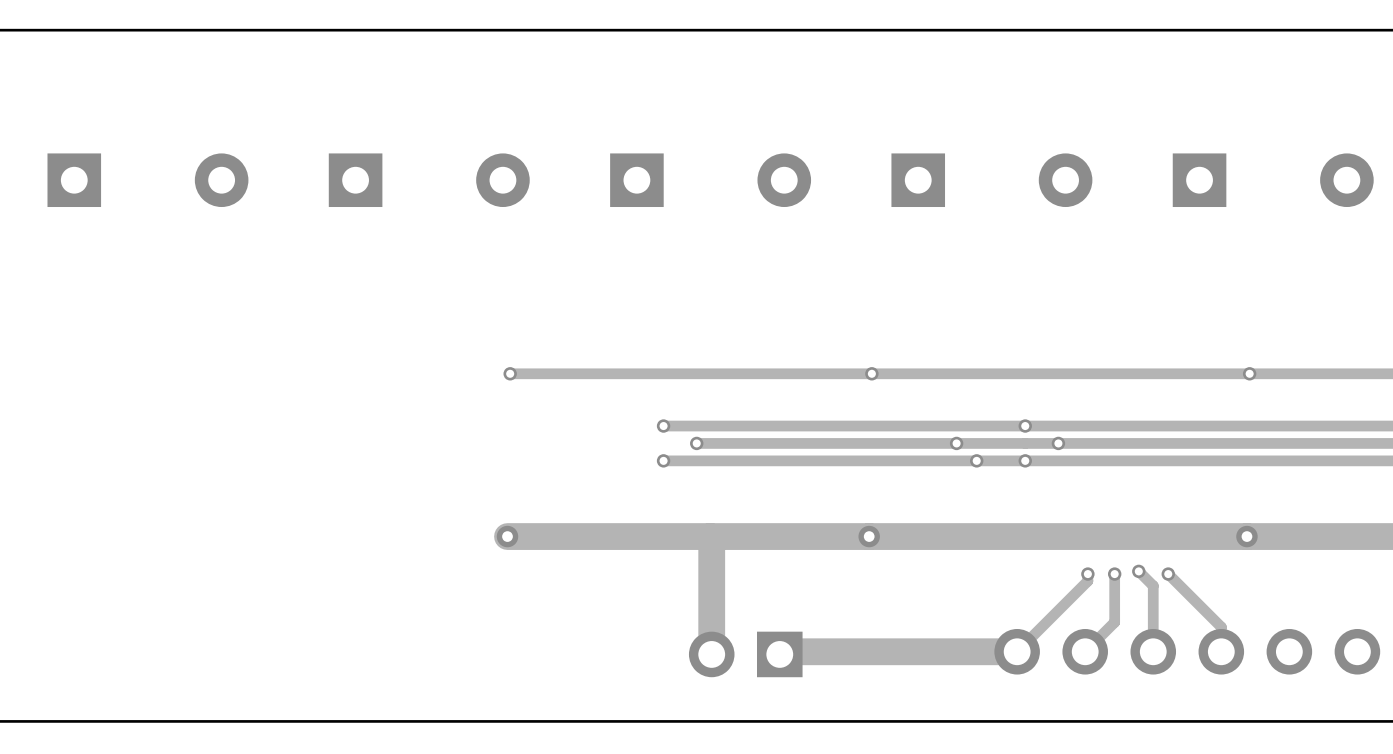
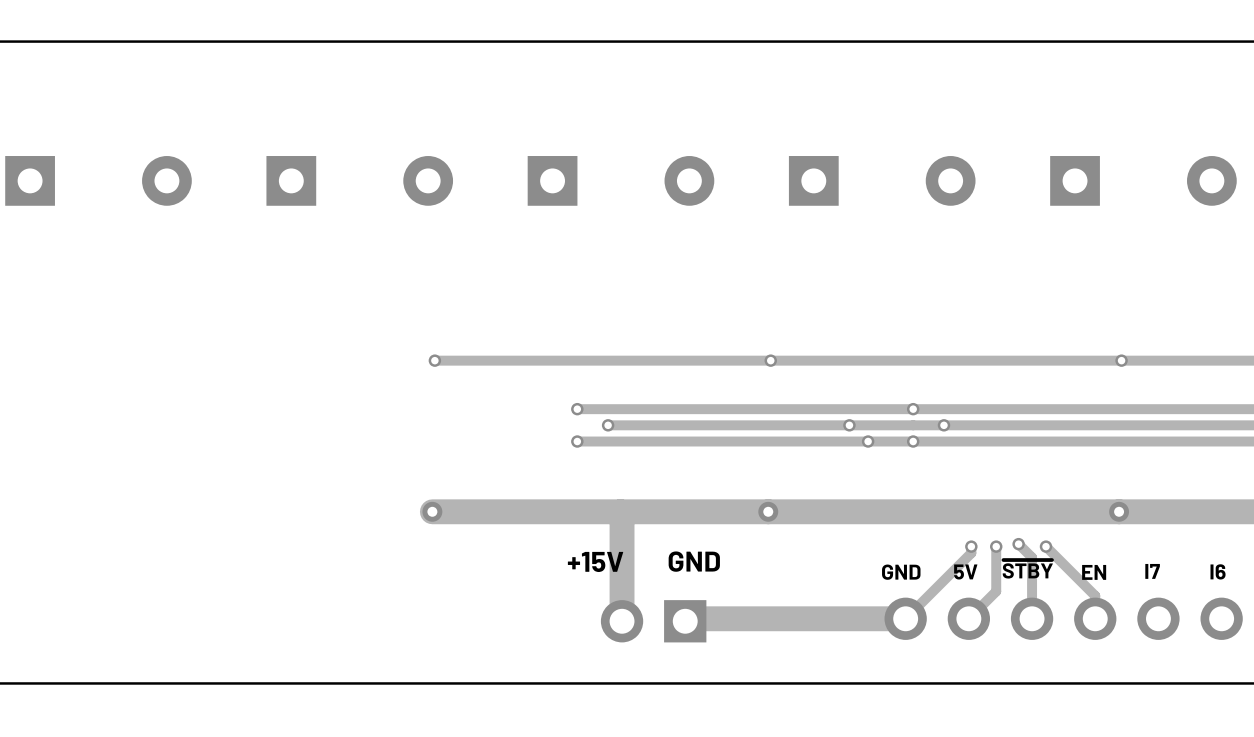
text: none -> +15V (595, 561)
text: none -> GND (694, 561)
text: none -> ~{STBY} (1027, 569)
text: none -> I7 (1152, 571)
text: none -> GND (901, 572)
text: none -> 5V (965, 571)
text: none -> EN (1094, 572)
text: none -> I6 (1218, 571)

